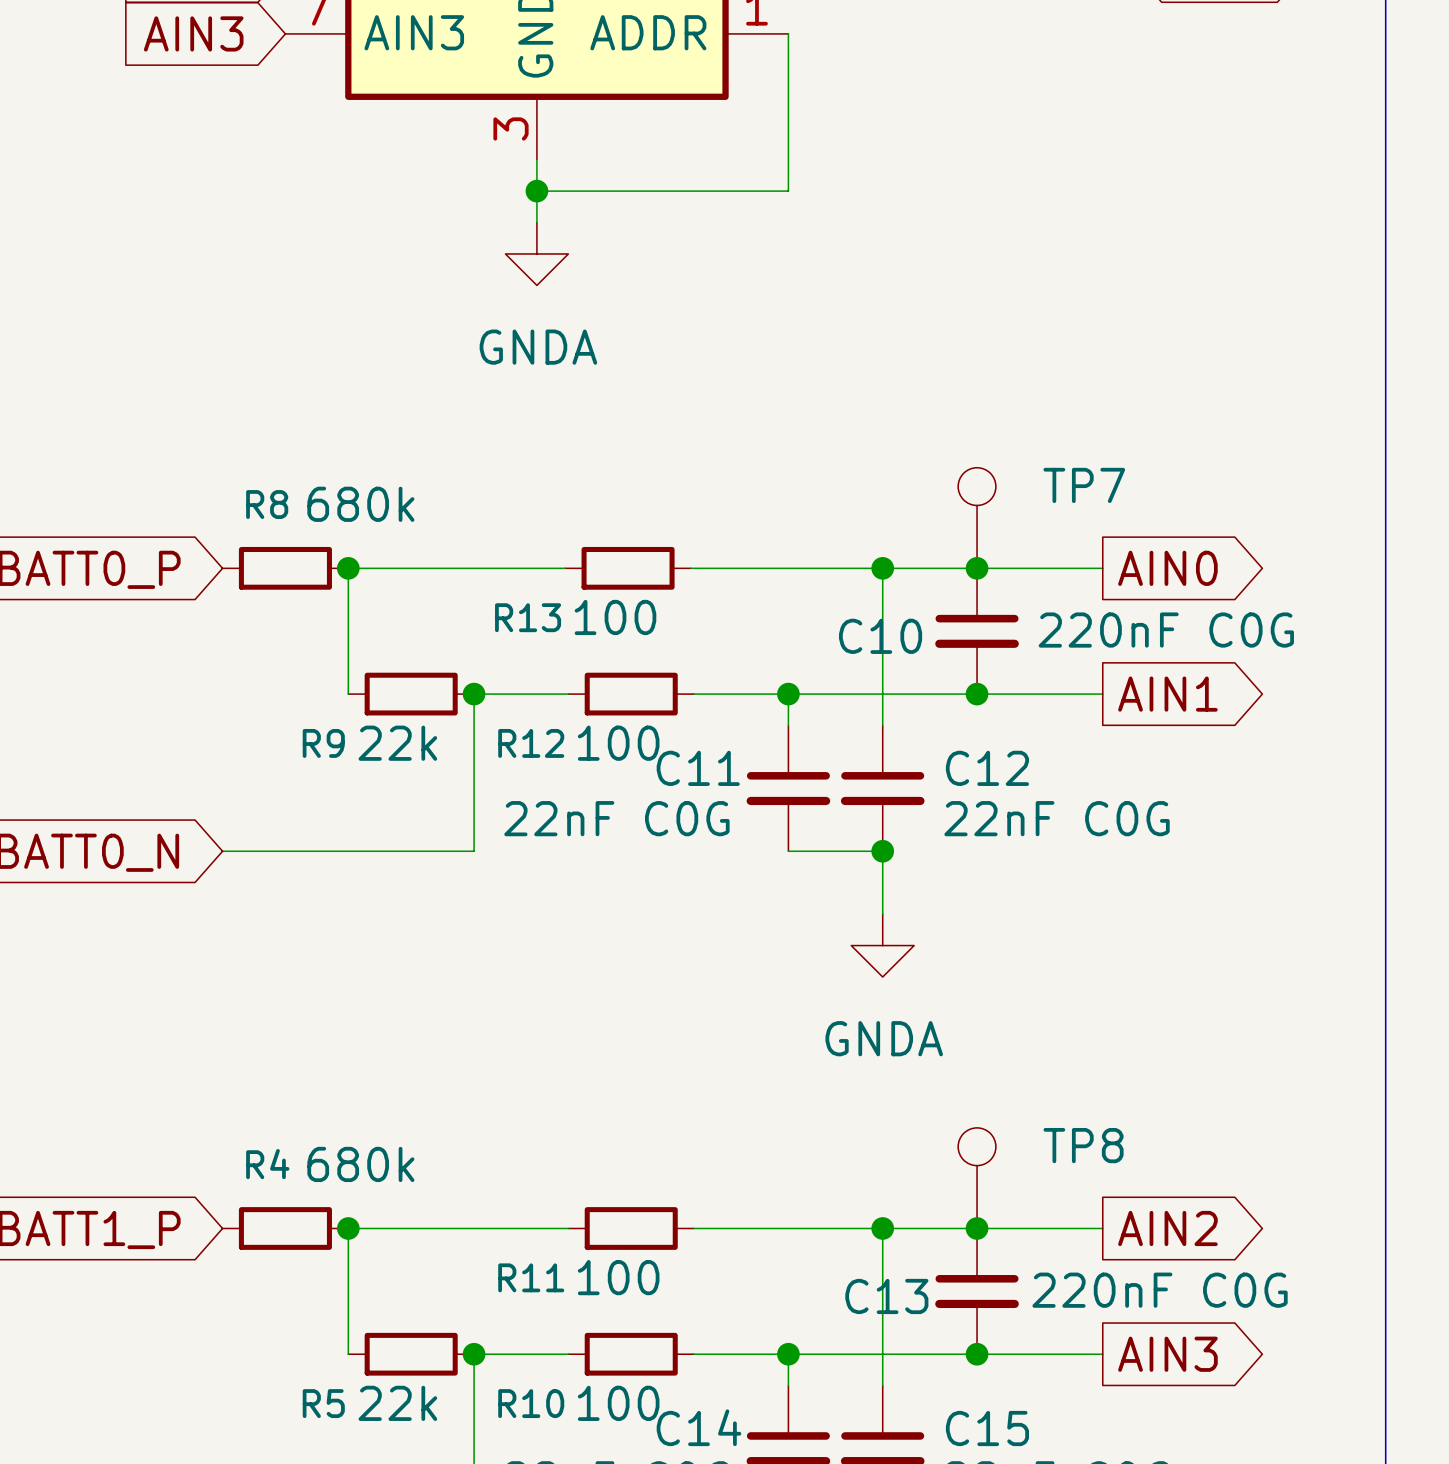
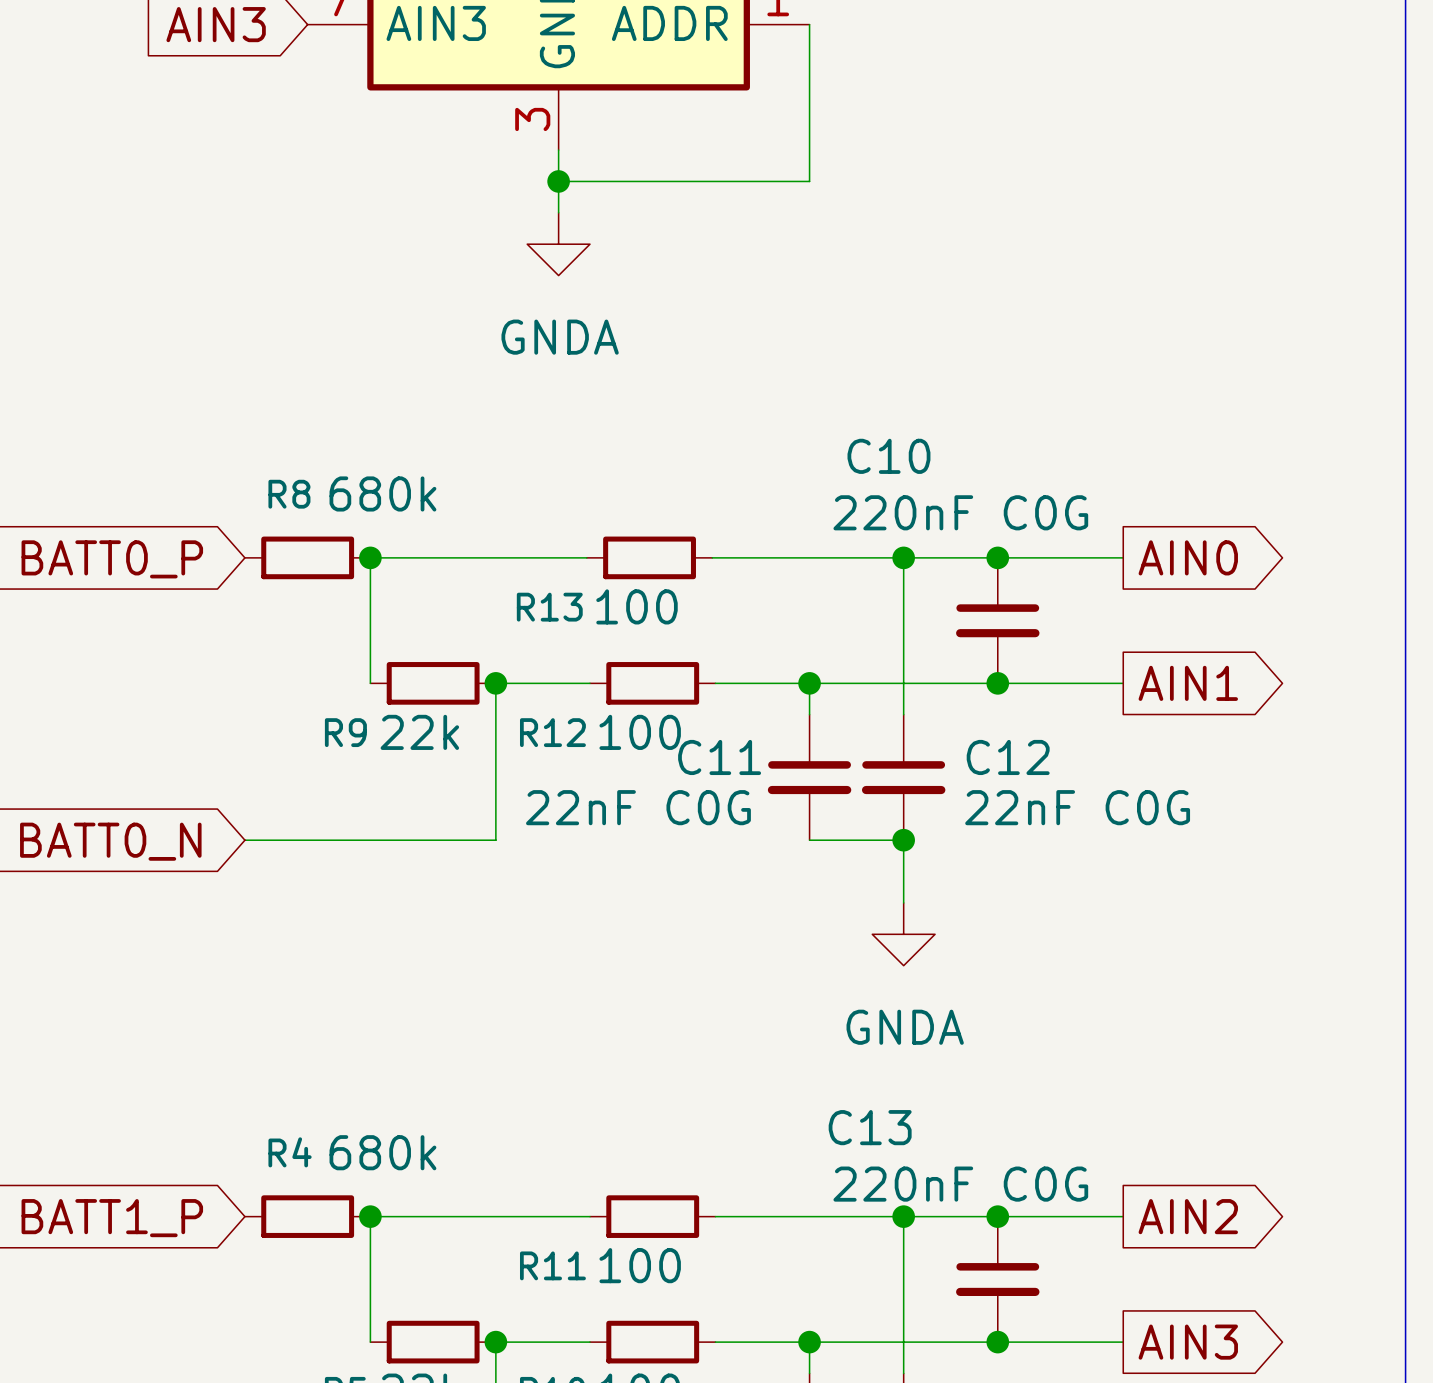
TP7: (977, 518) -> none
C10 value position: 220nF C0G (1166, 630) -> 220nF C0G (960, 512)
C10 name position: C10 (880, 636) -> C10 (888, 456)
TP8: (977, 1178) -> none
C13 value position: 220nF C0G (1160, 1290) -> 220nF C0G (960, 1184)
C13 name position: C13 (886, 1296) -> C13 (870, 1127)

